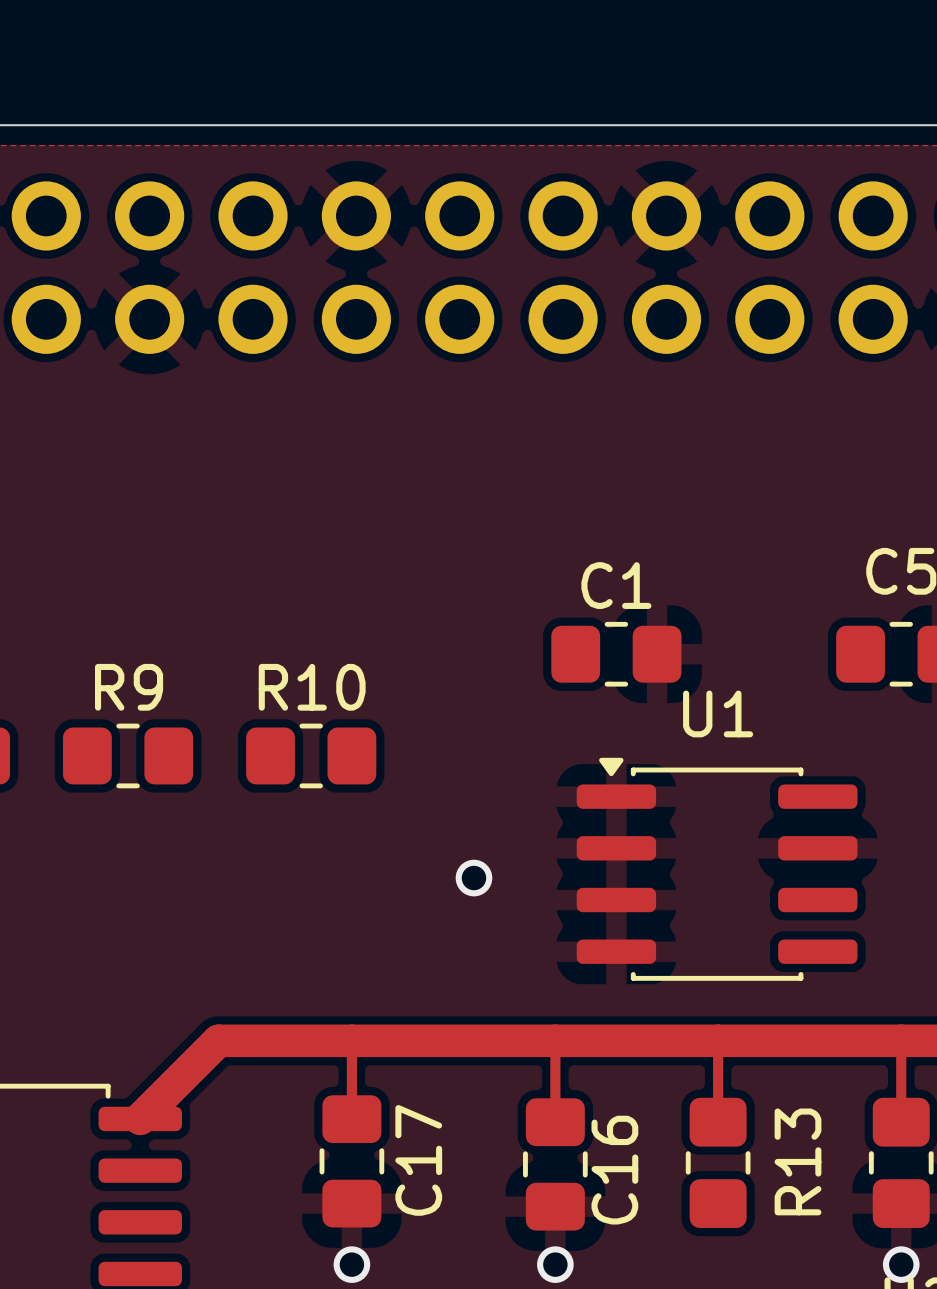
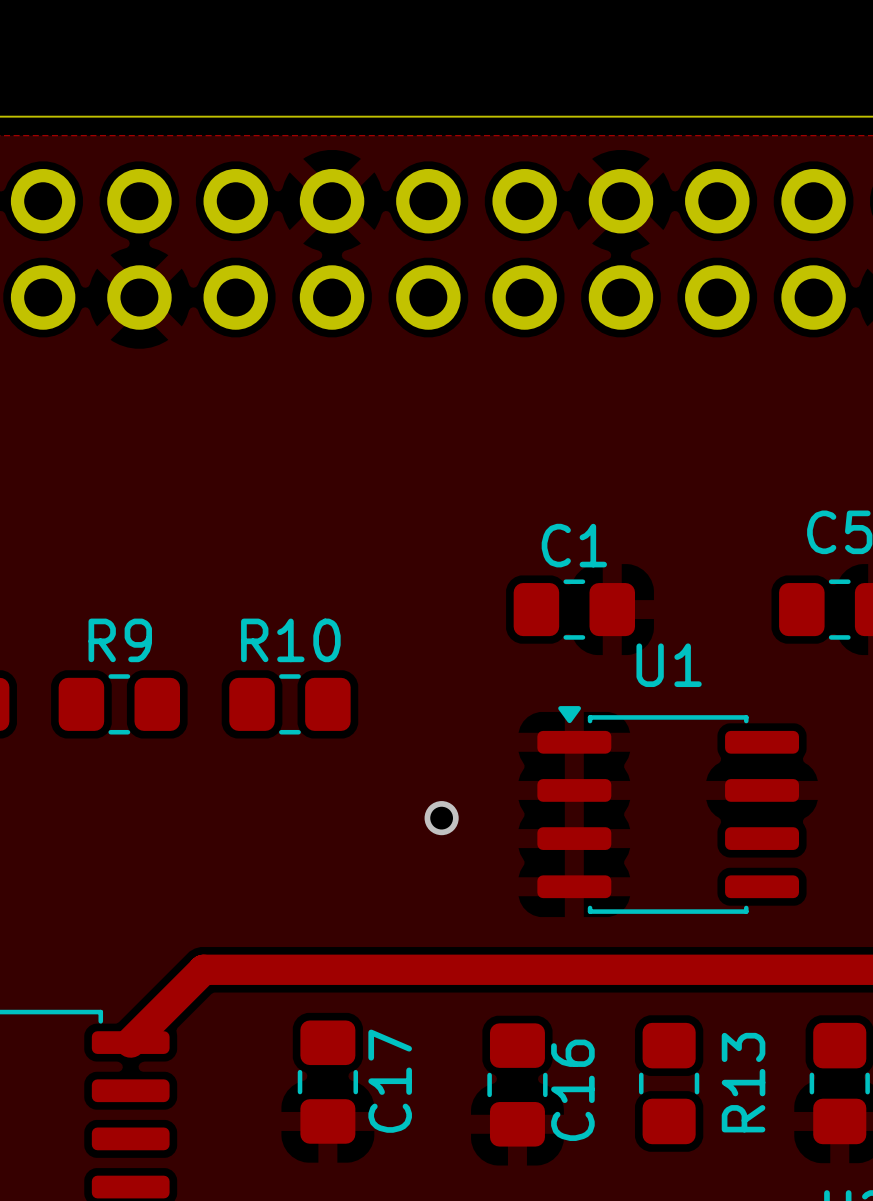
track: (351, 1040) (351, 1119) -> none
track: (555, 1040) (555, 1122) -> none
track: (718, 1040) (718, 1122) -> none
track: (901, 1040) (901, 1122) -> none
via: (351, 1264) -> none
via: (555, 1264) -> none
via: (901, 1264) -> none

